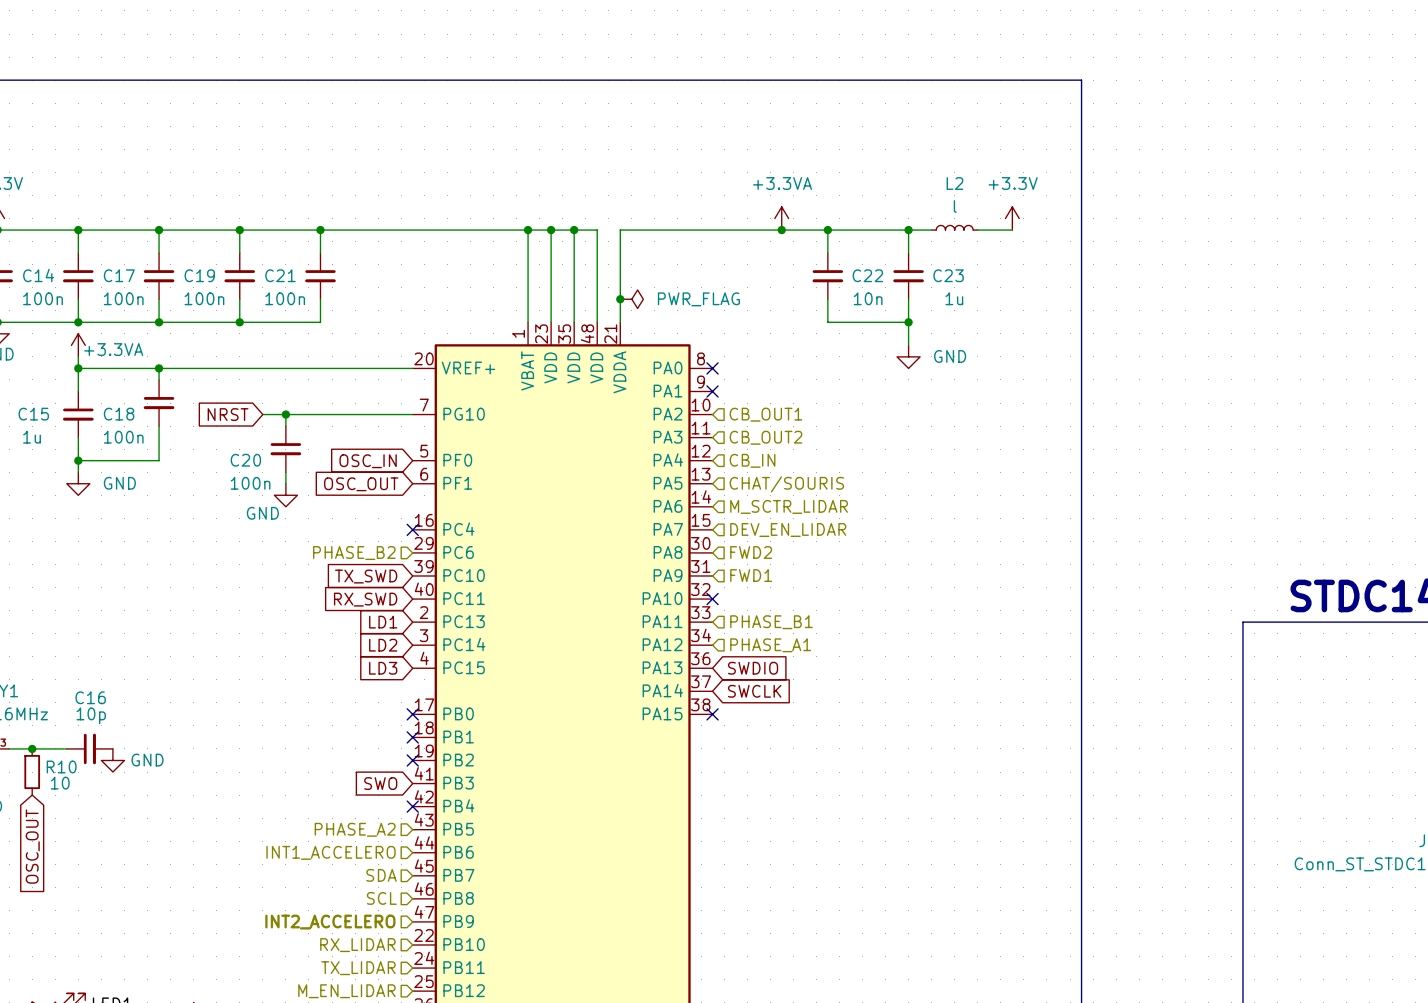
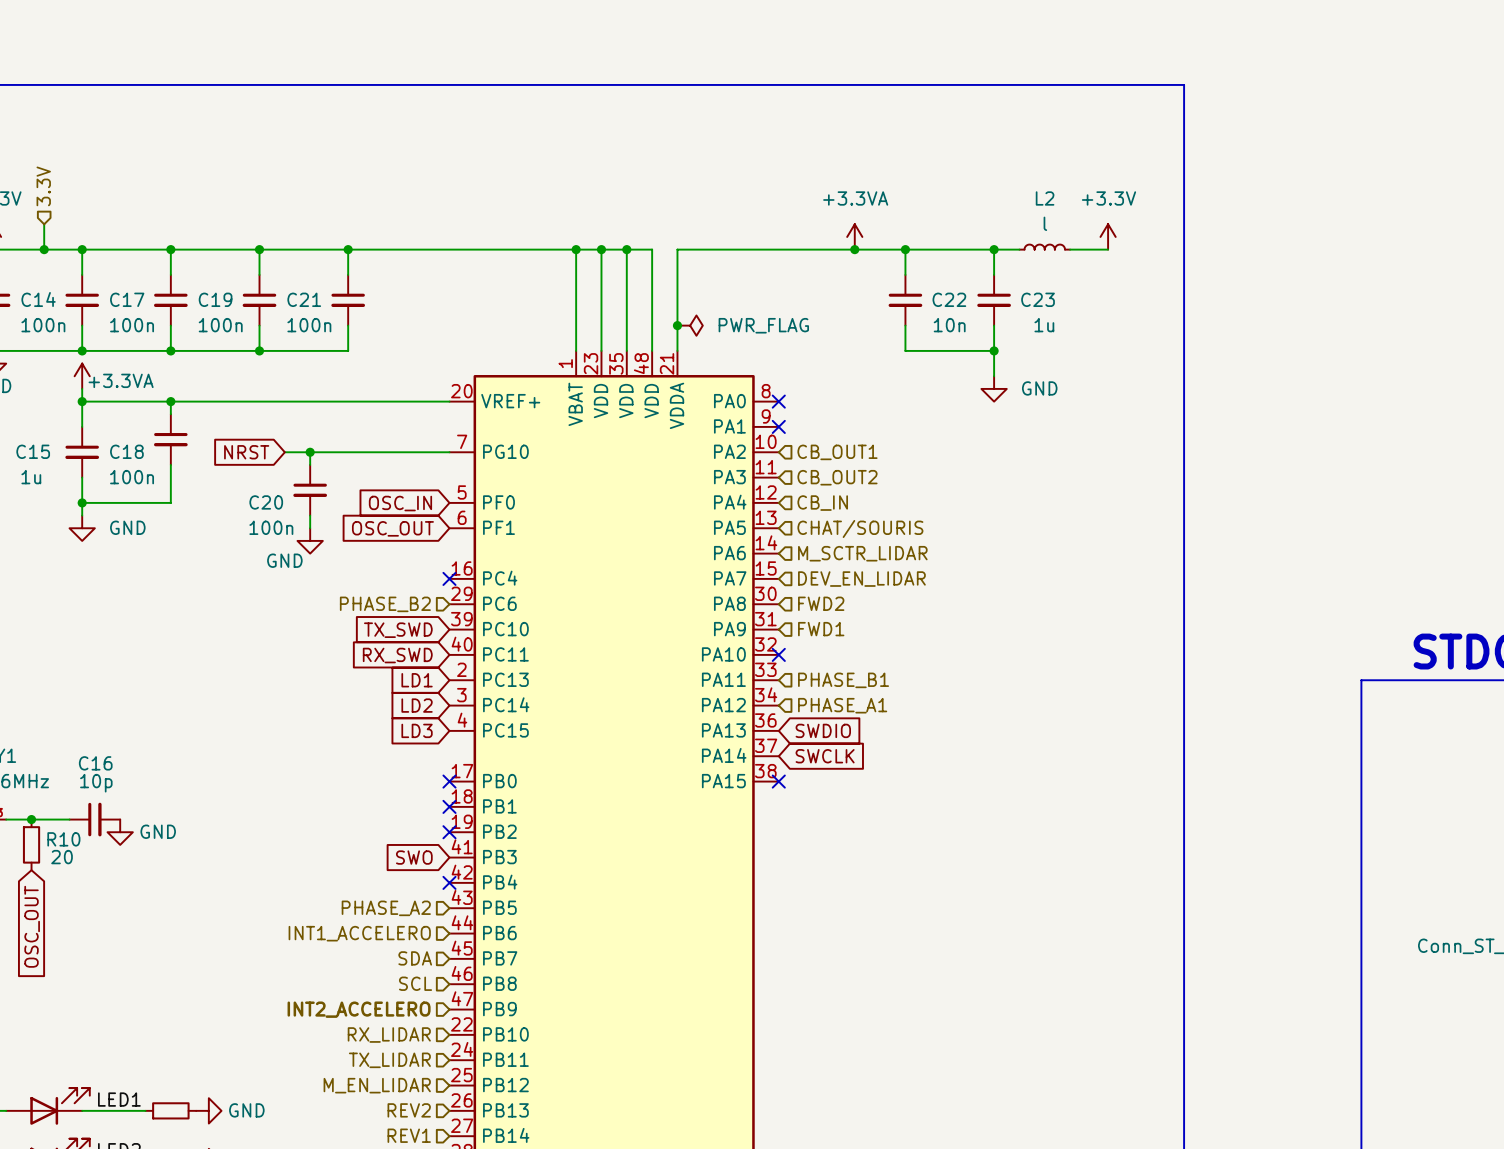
hierarchical label: none -> 3.3V (43, 186)
wire: none -> (44, 224) (44, 249)
junction: none -> (44, 249)
R10 value: 10 (60, 783) -> 20 (62, 857)

